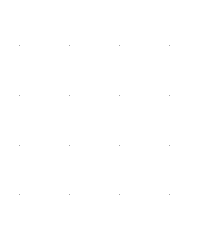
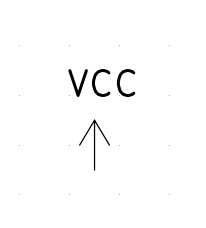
power symbol: none -> VCC (94, 145)

